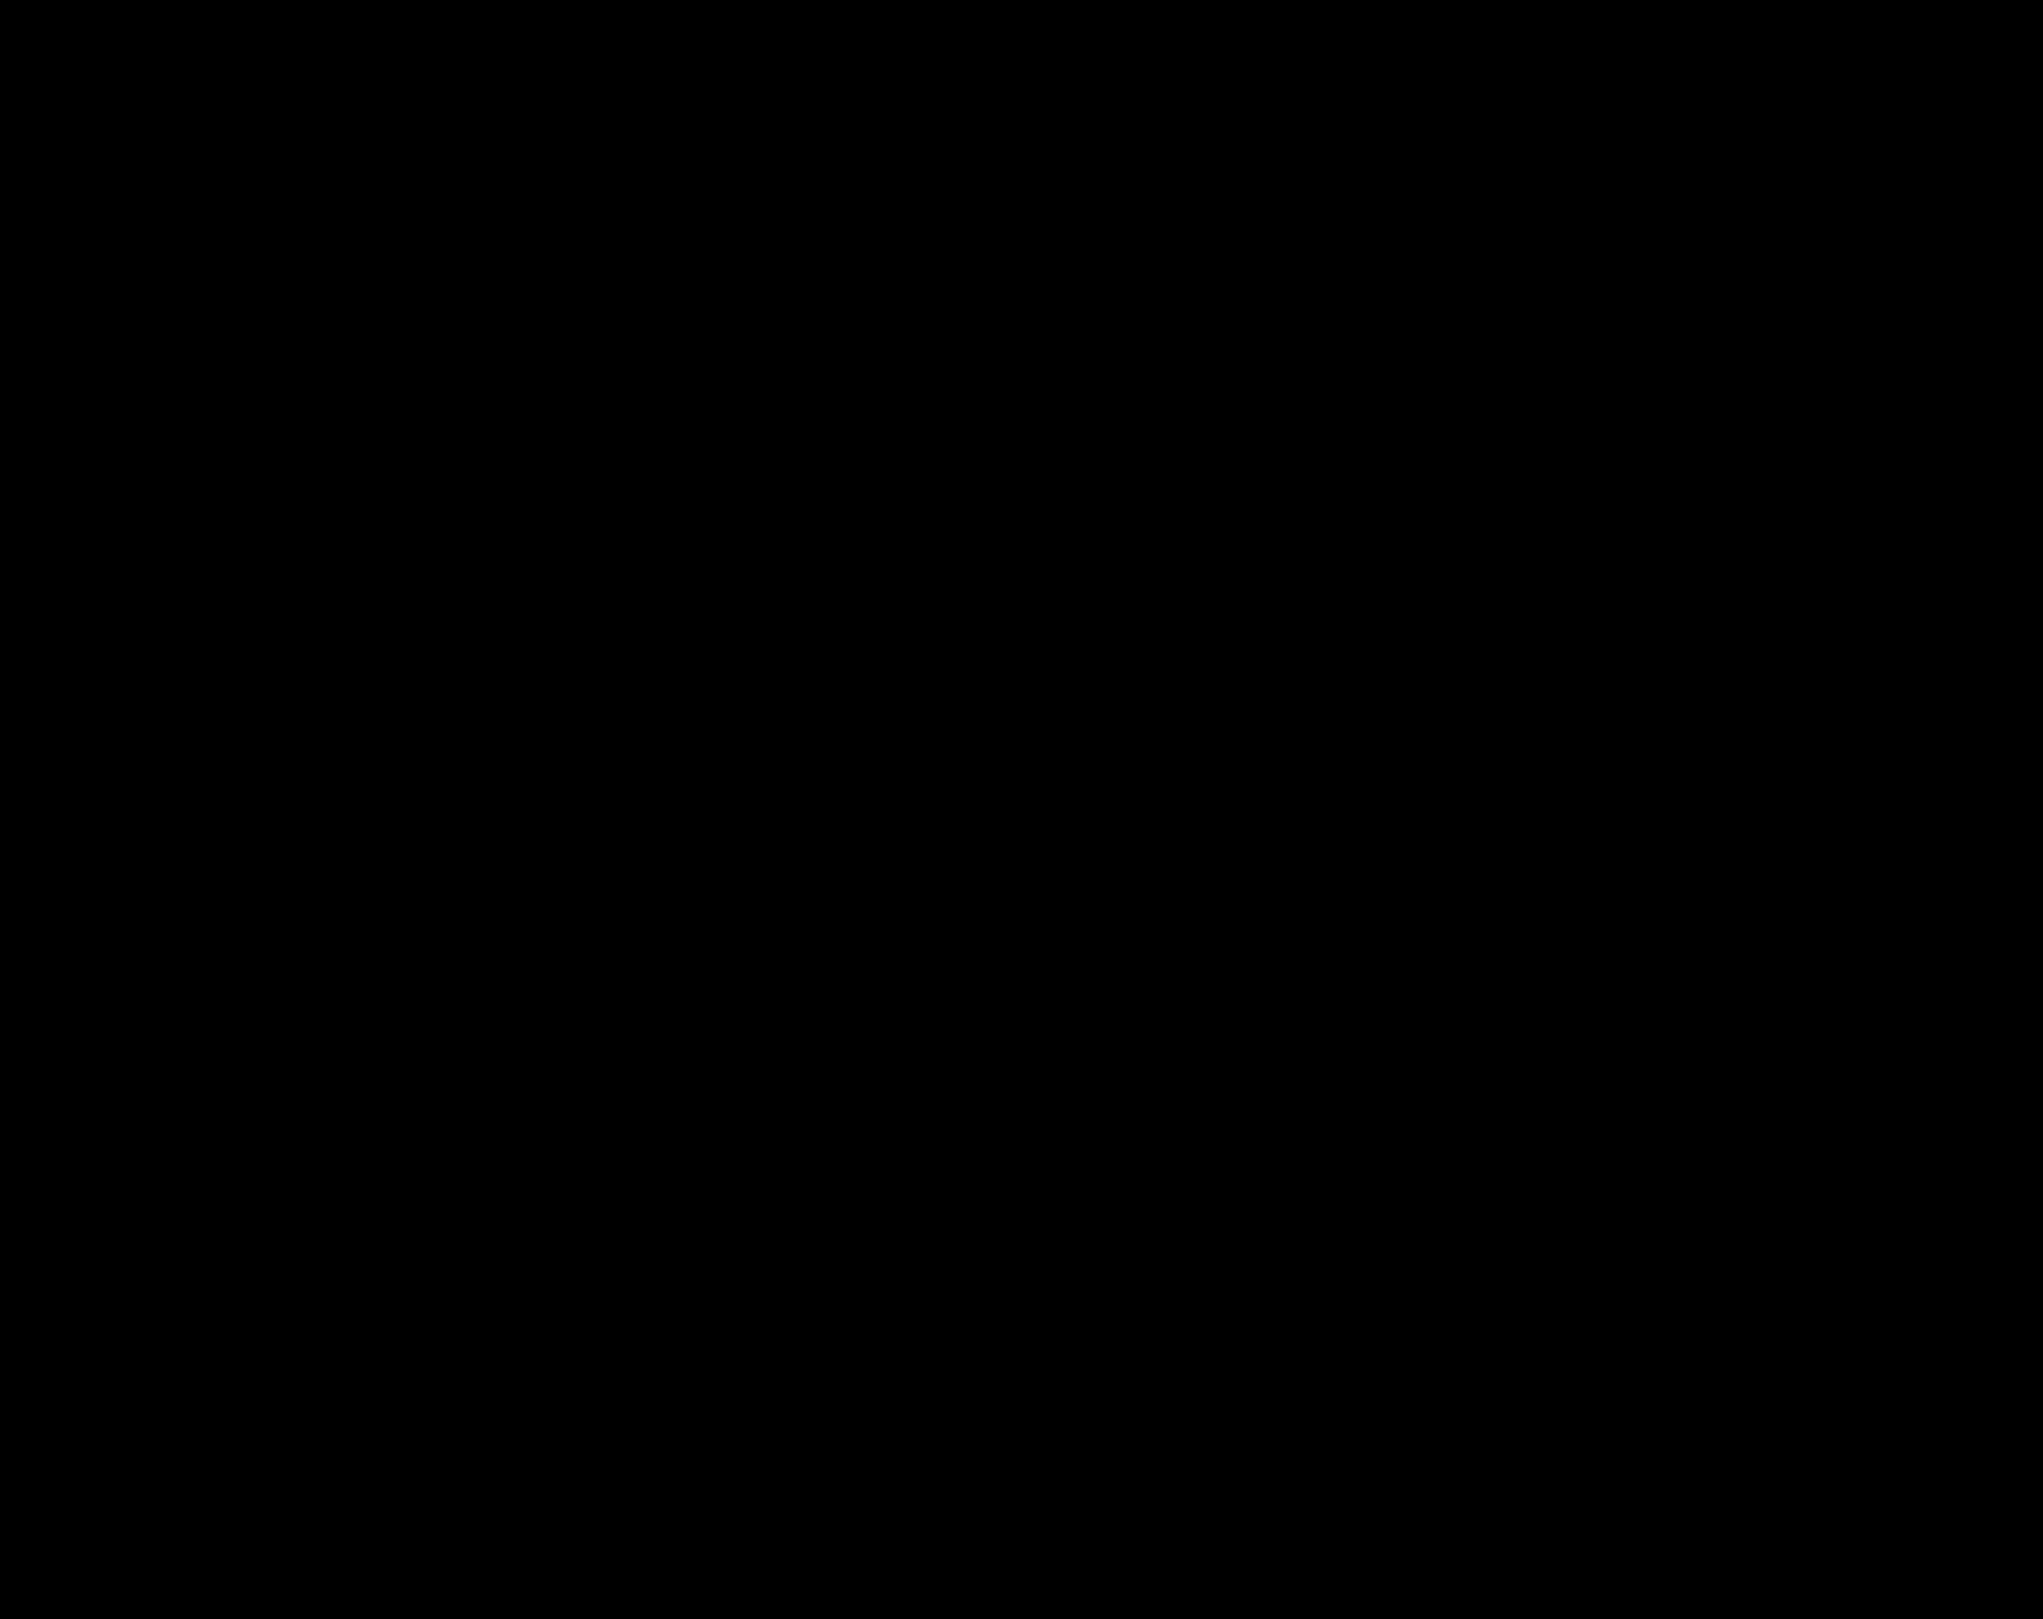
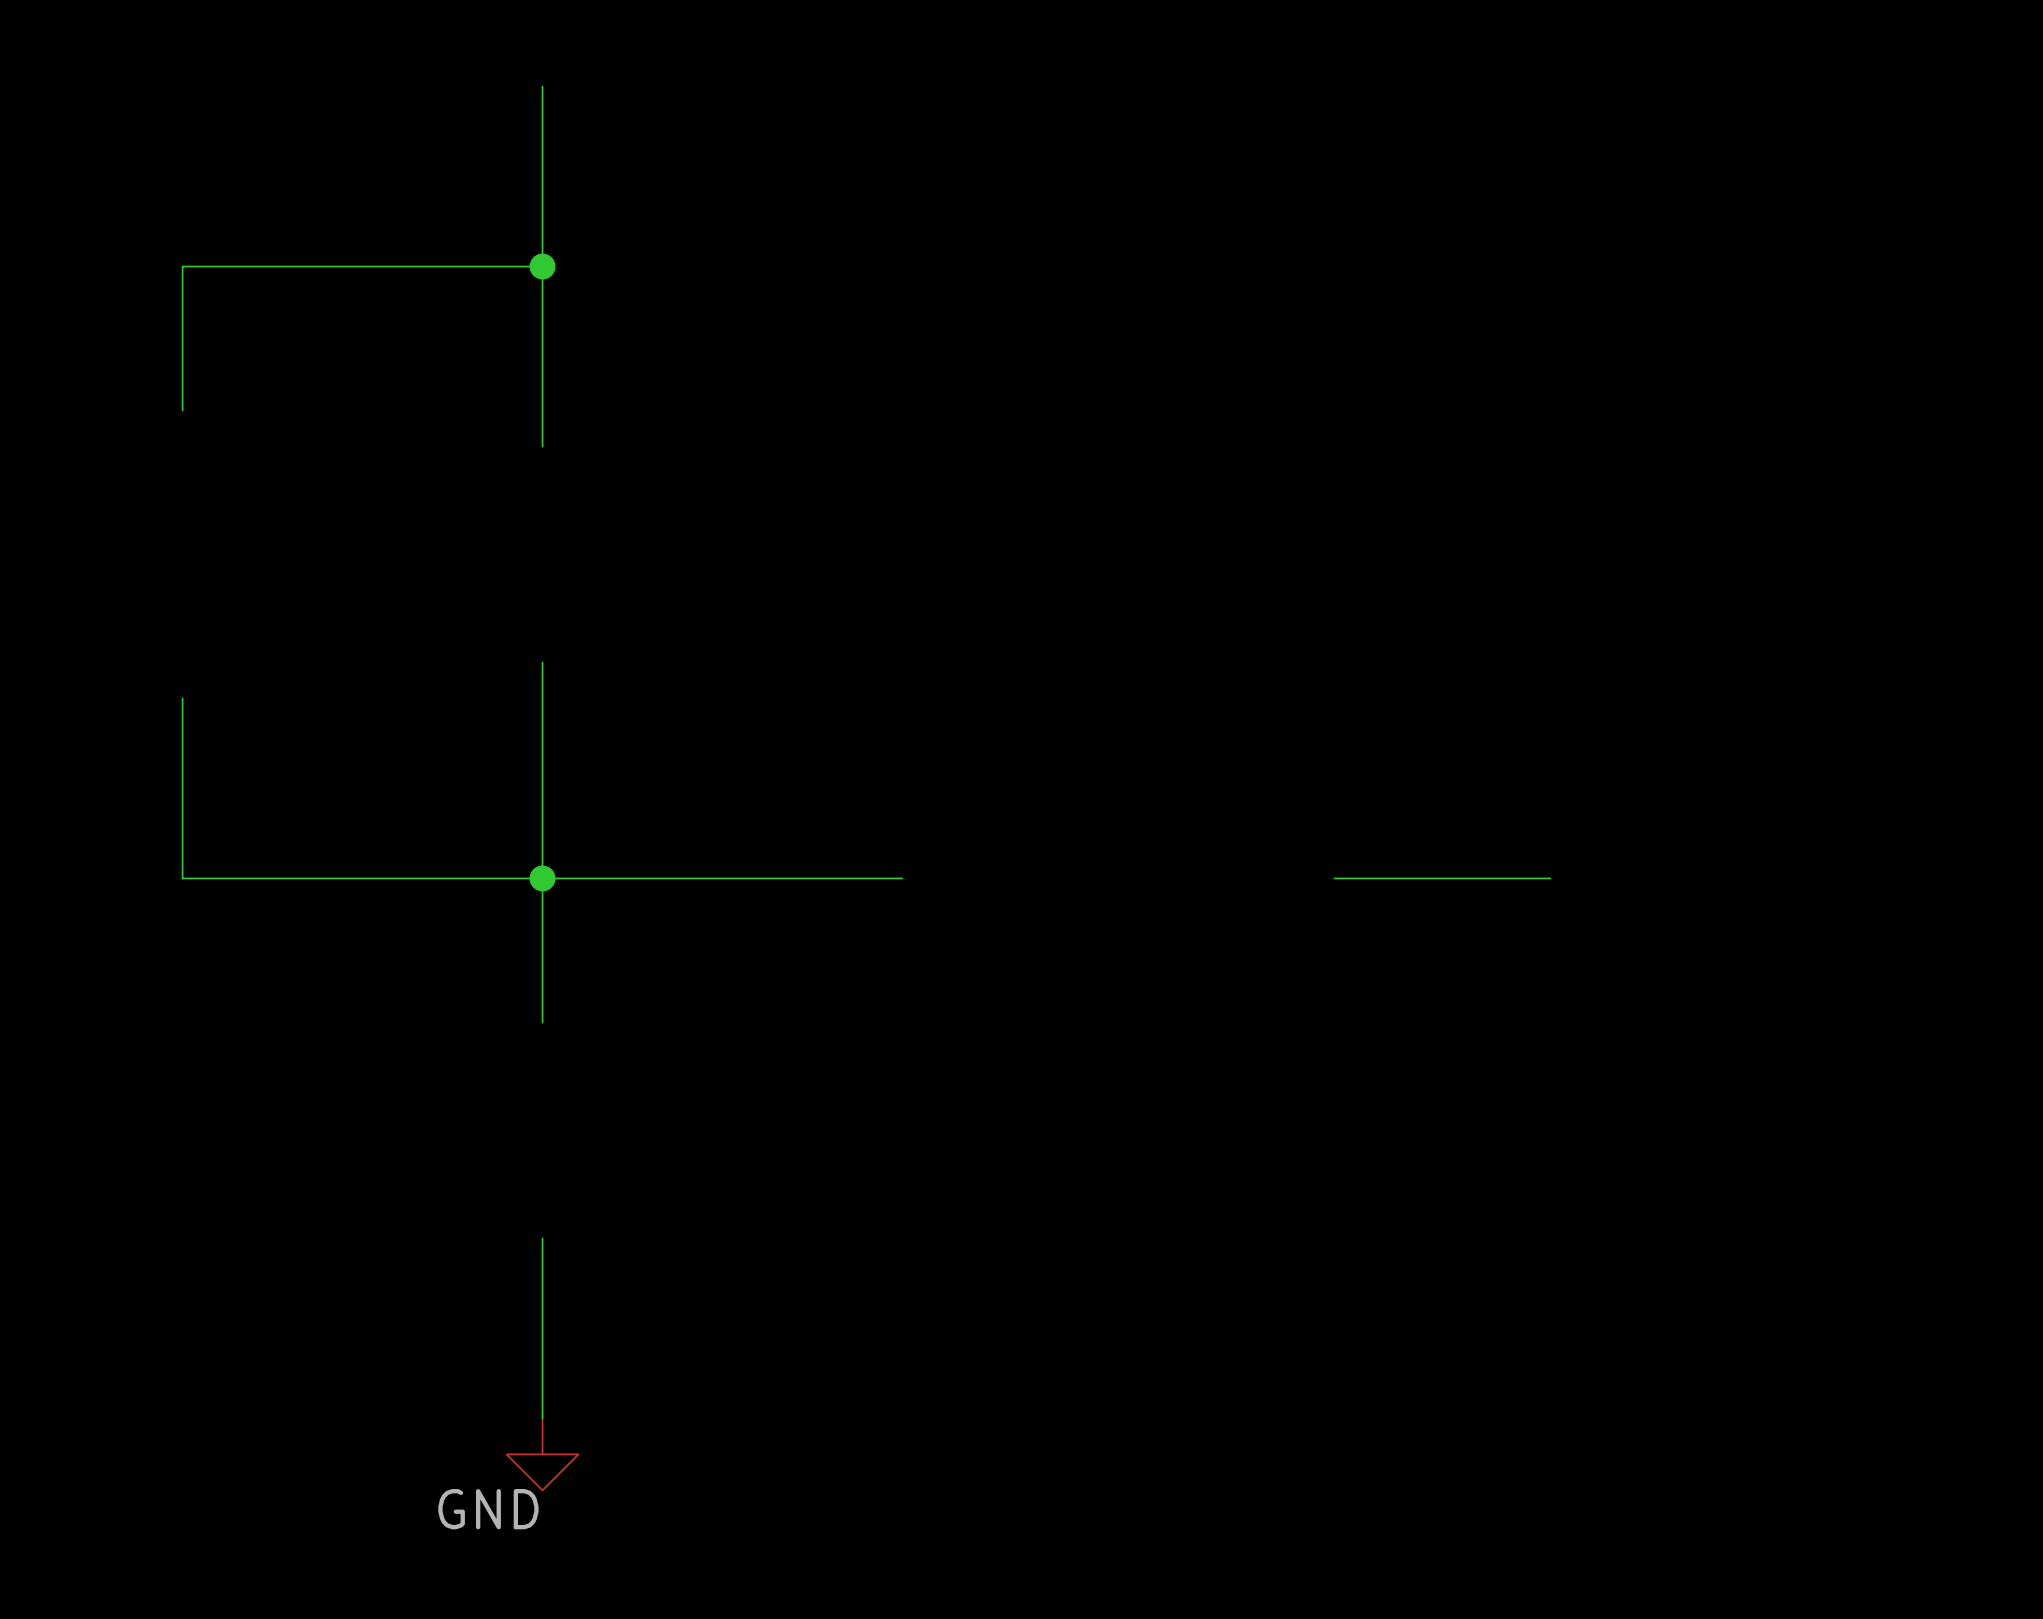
wire: none -> (542, 86) (542, 446)
wire: none -> (542, 266) (182, 266) (182, 410)
junction: none -> (542, 266)
wire: none -> (542, 662) (542, 1022)
wire: none -> (182, 698) (182, 878) (902, 878)
junction: none -> (542, 878)
wire: none -> (1334, 878) (1550, 878)
wire: none -> (542, 1238) (542, 1418)
power symbol: none -> GND (542, 1454)

